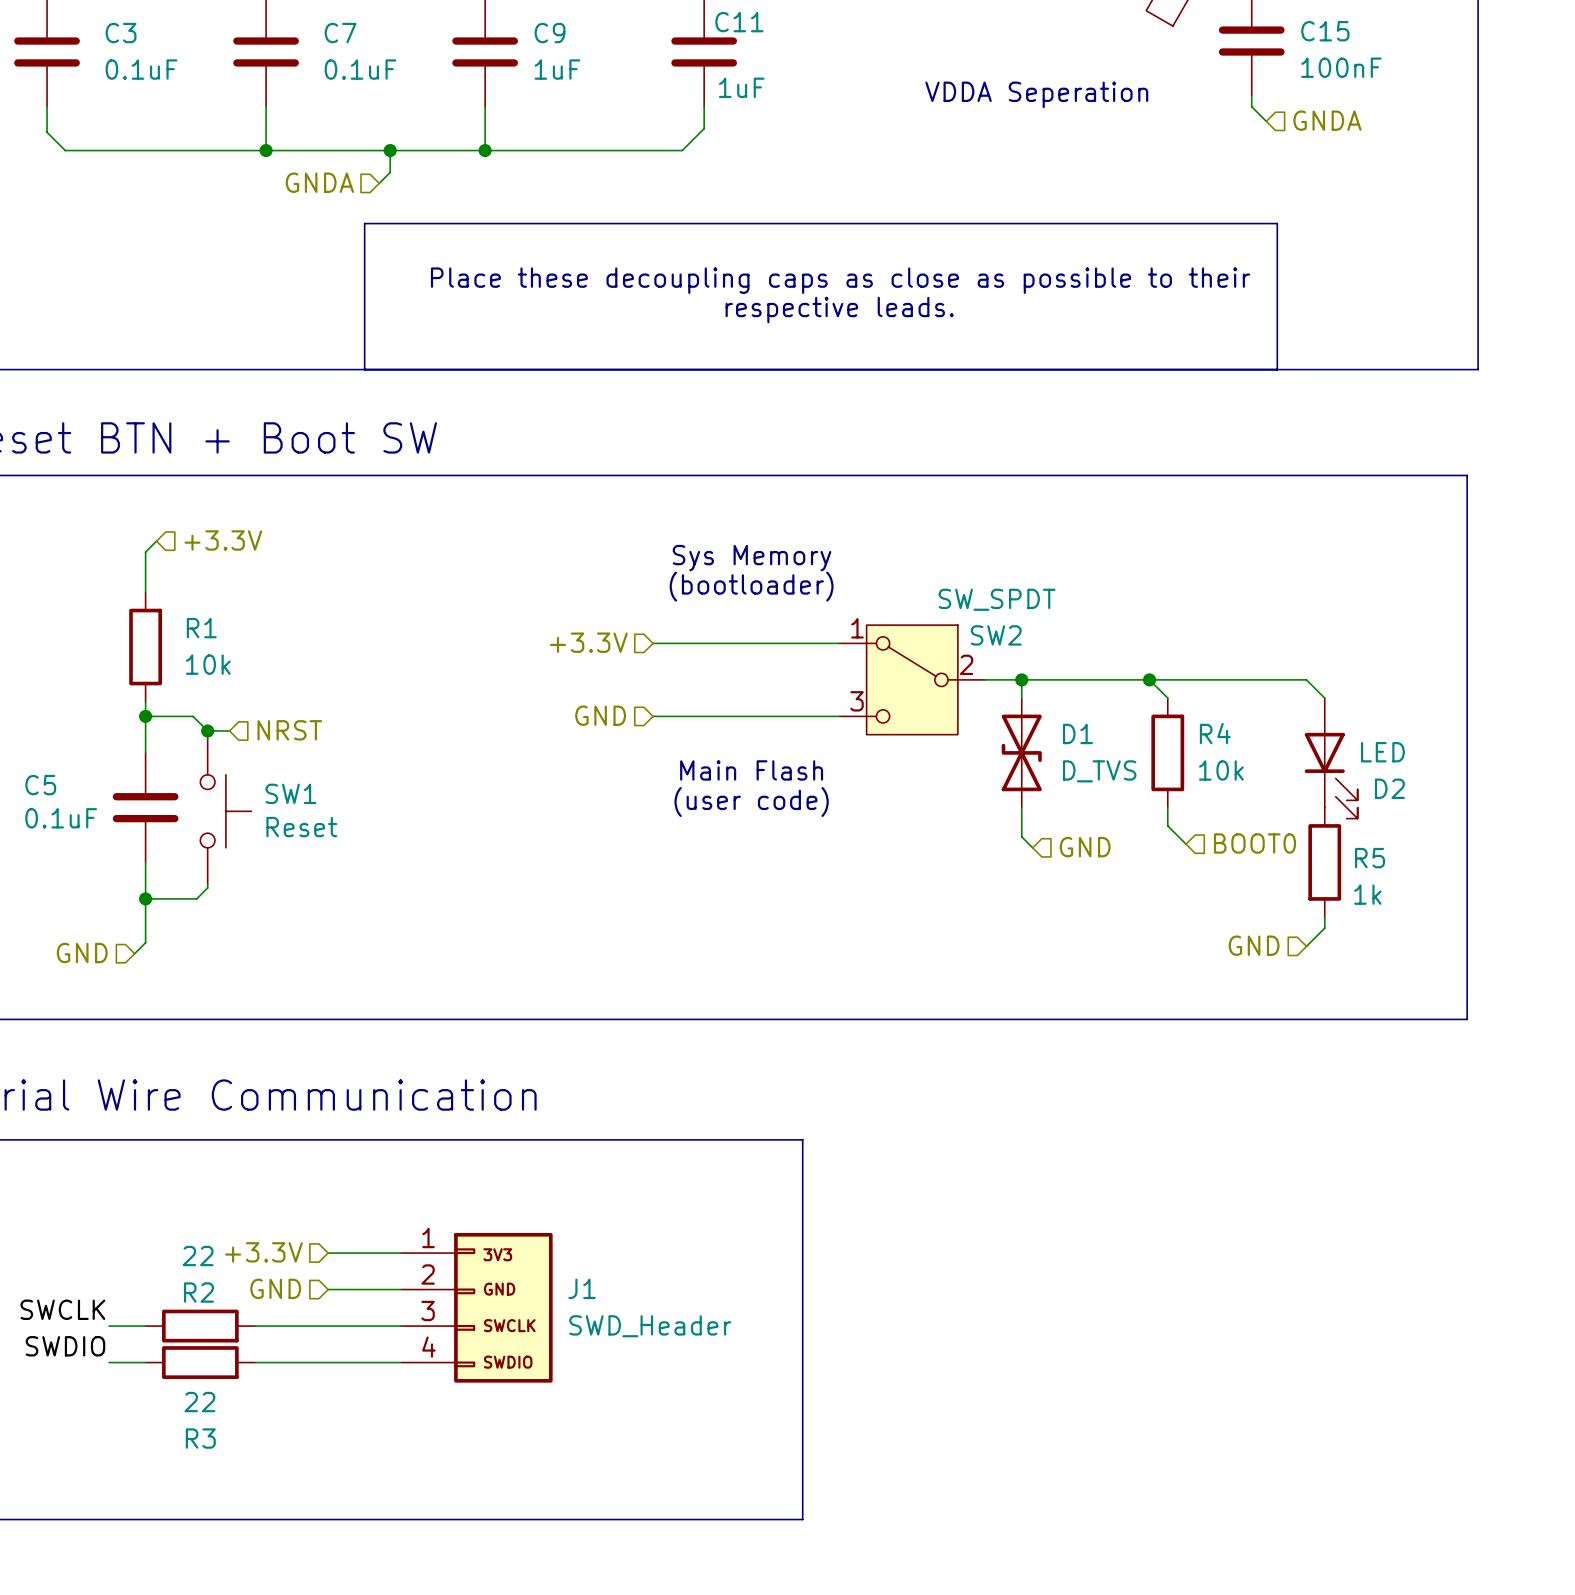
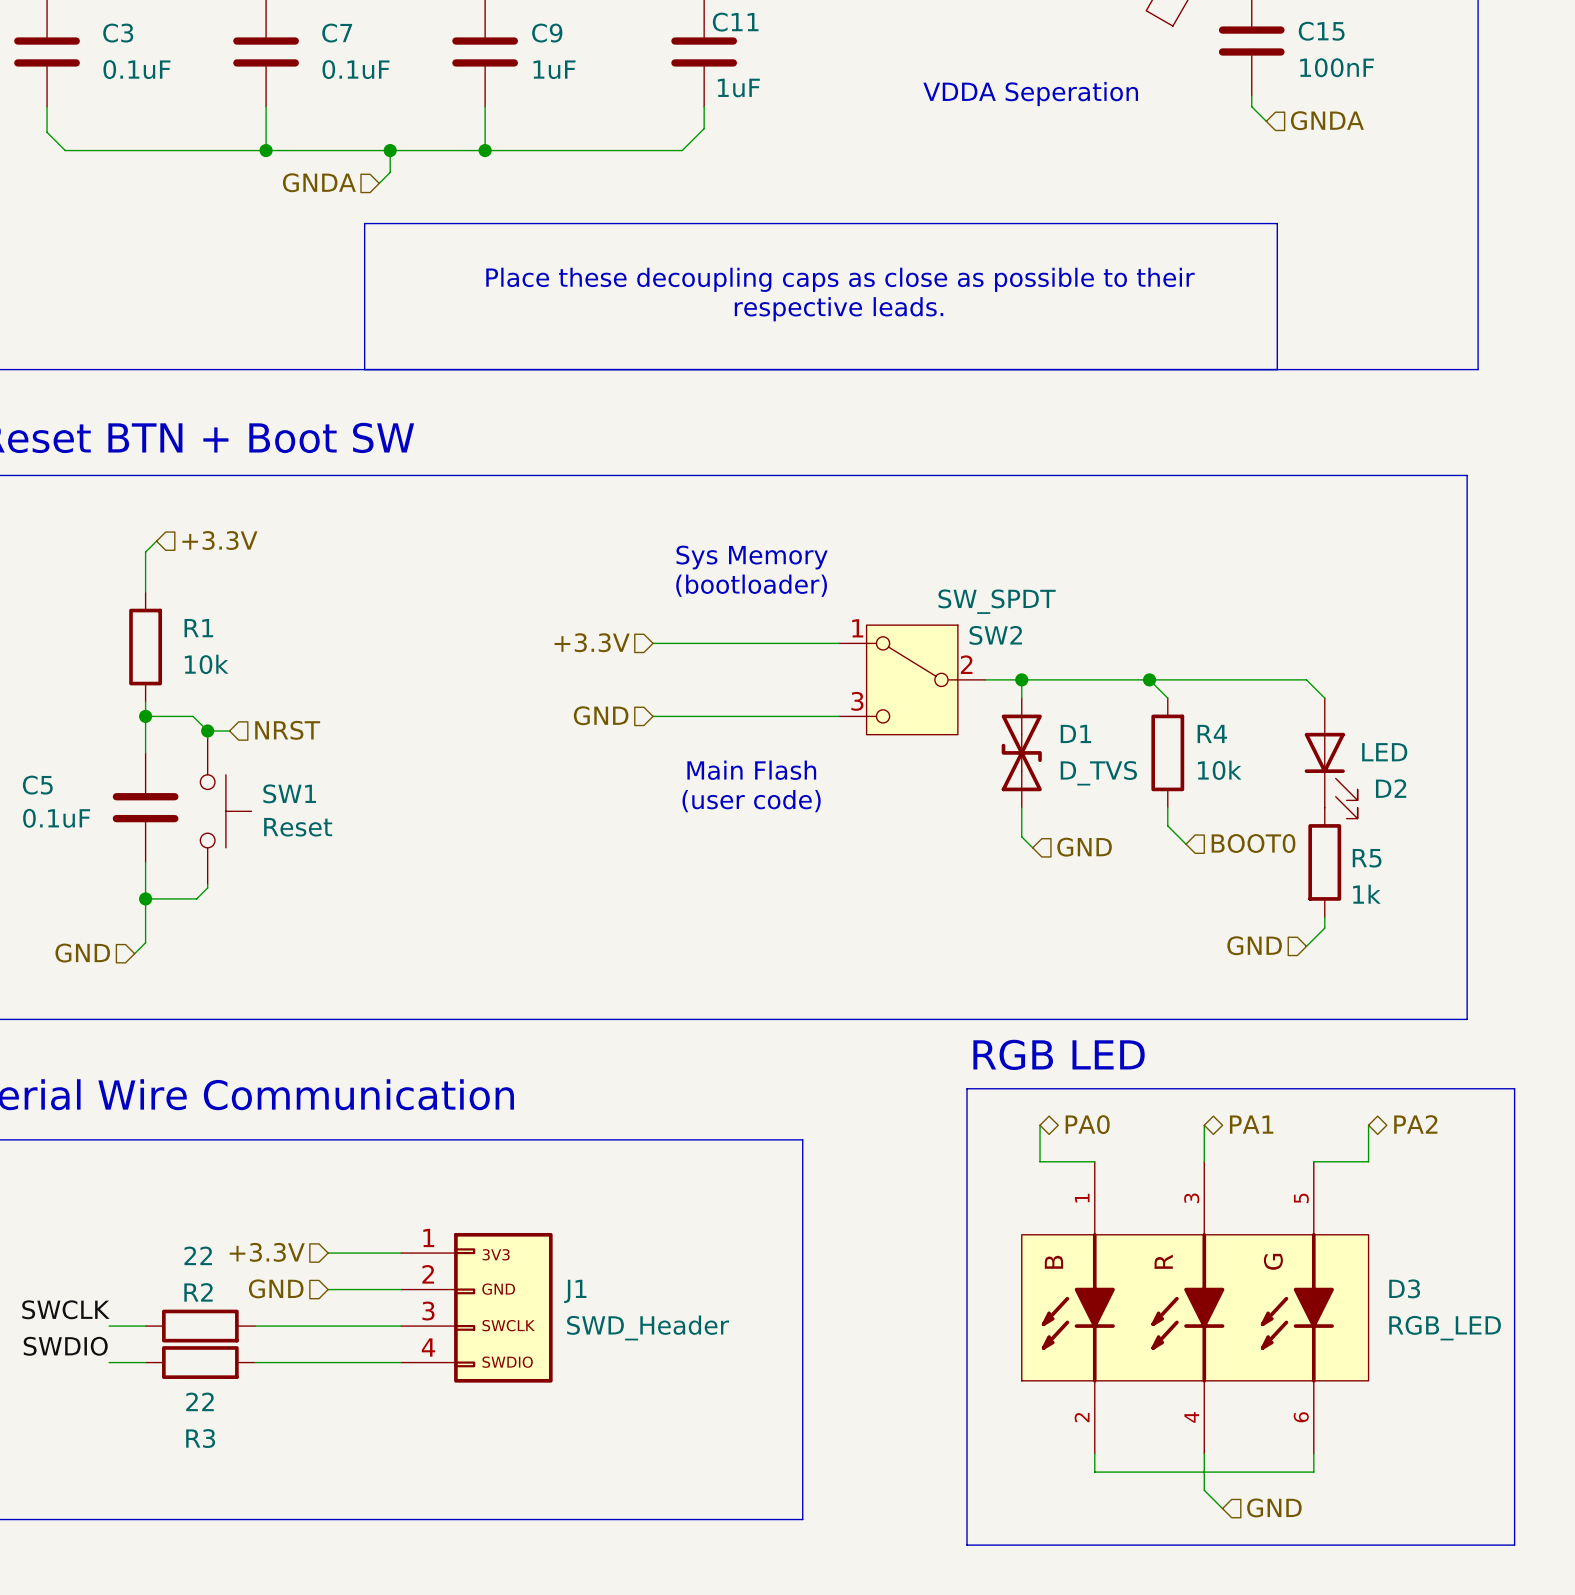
text: none -> RGB LED (1059, 1054)
line: none -> (967, 1088) (1514, 1088) (1514, 1545) (967, 1545) (967, 1088)
hierarchical label: none -> PA0 (1087, 1124)
hierarchical label: none -> PA1 (1251, 1124)
hierarchical label: none -> PA2 (1415, 1124)
wire: none -> (1040, 1125) (1040, 1161) (1094, 1161)
wire: none -> (1204, 1125) (1204, 1161)
wire: none -> (1368, 1125) (1368, 1161) (1313, 1161)
D3: none -> RGB_LED (1195, 1307)
wire: none -> (1094, 1453) (1094, 1472) (1313, 1472) (1313, 1453)
wire: none -> (1204, 1453) (1204, 1490) (1222, 1508)
hierarchical label: none -> GND (1274, 1507)

